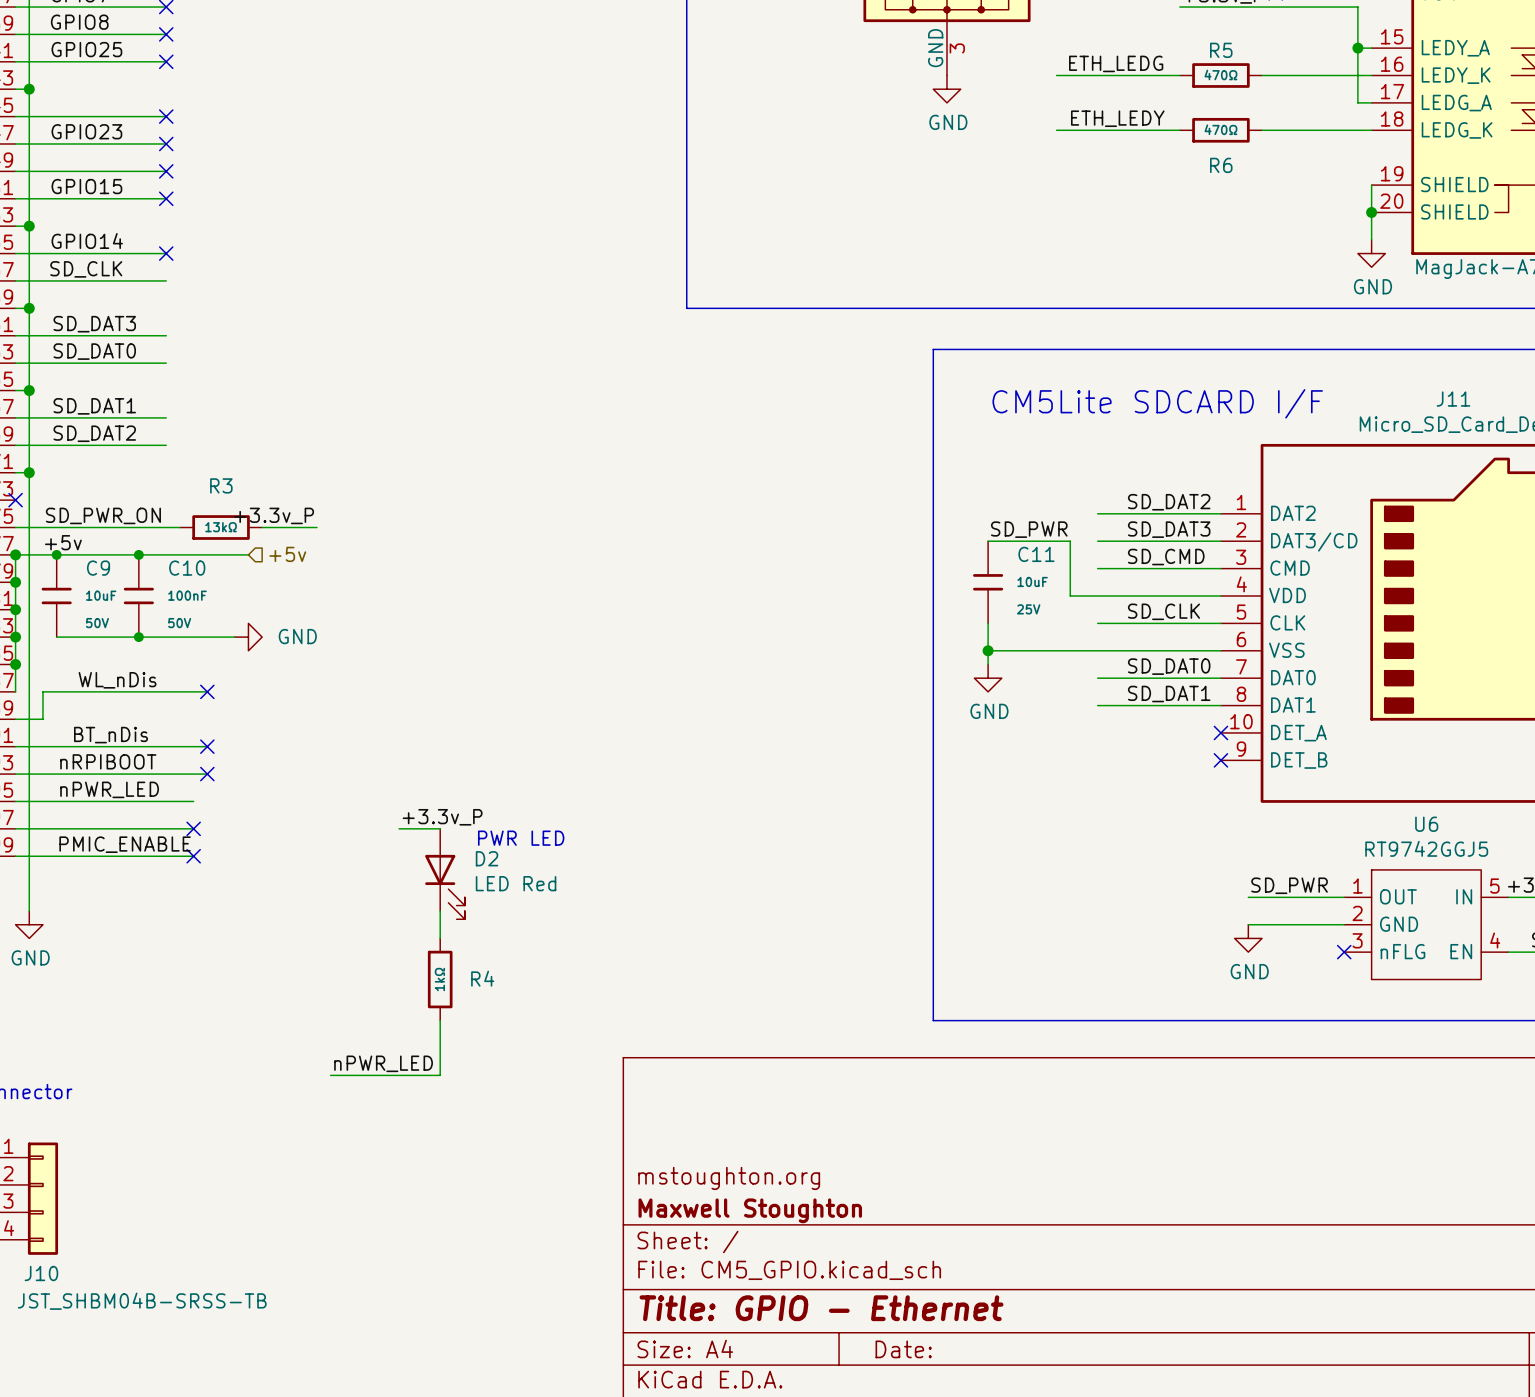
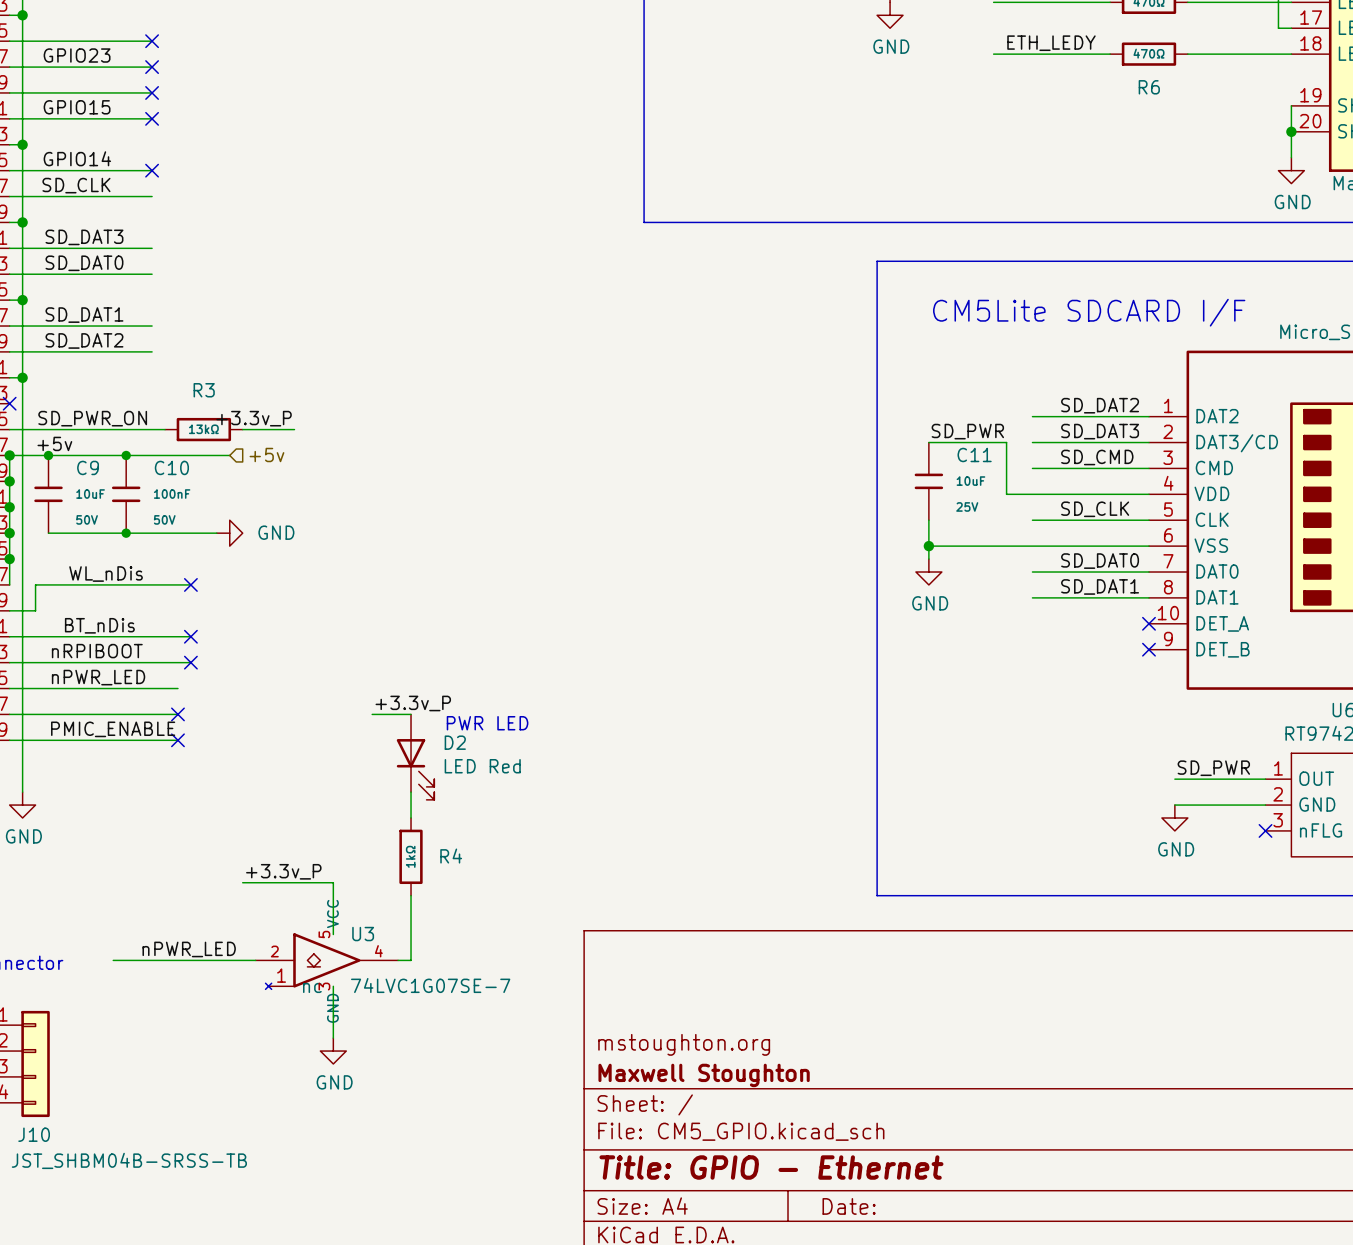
label: none -> +3.3v_P (283, 871)
wire: none -> (242, 882) (333, 882) (333, 934)
label position: nPWR_LED (383, 1063) -> nPWR_LED (189, 949)
wire: (330, 1075) (440, 1075) -> (398, 960) (411, 960) (411, 947)
wire: none -> (113, 960) (255, 960)
U3: none -> 74LVC1G07SE-7 (326, 961)
wire: none -> (333, 986) (333, 1038)
power symbol: none -> GND (333, 1051)

